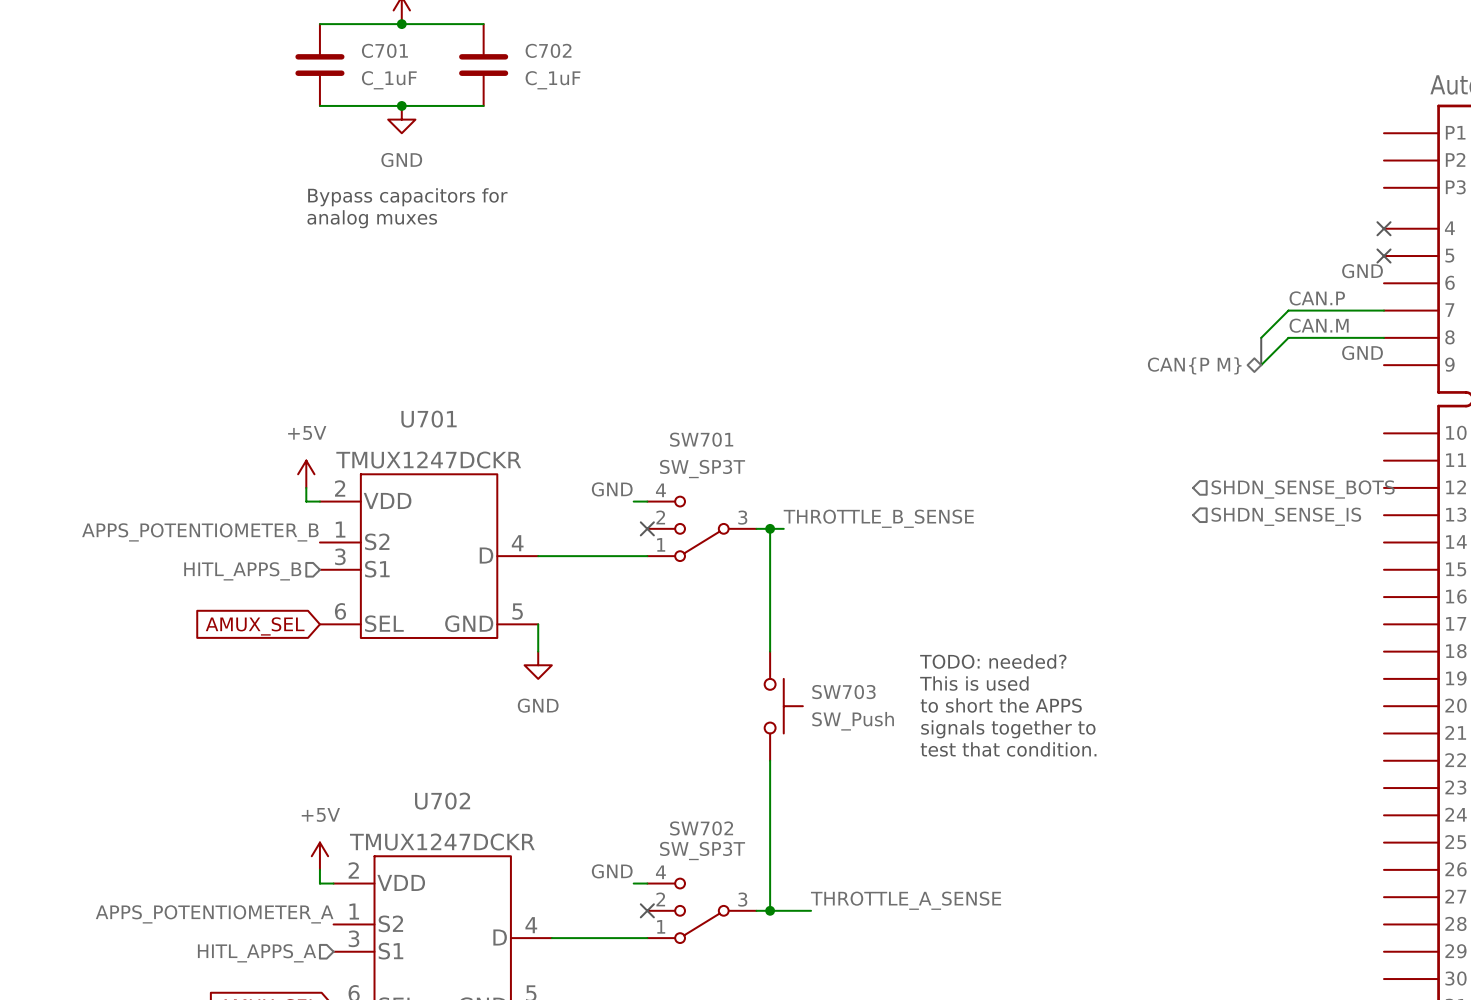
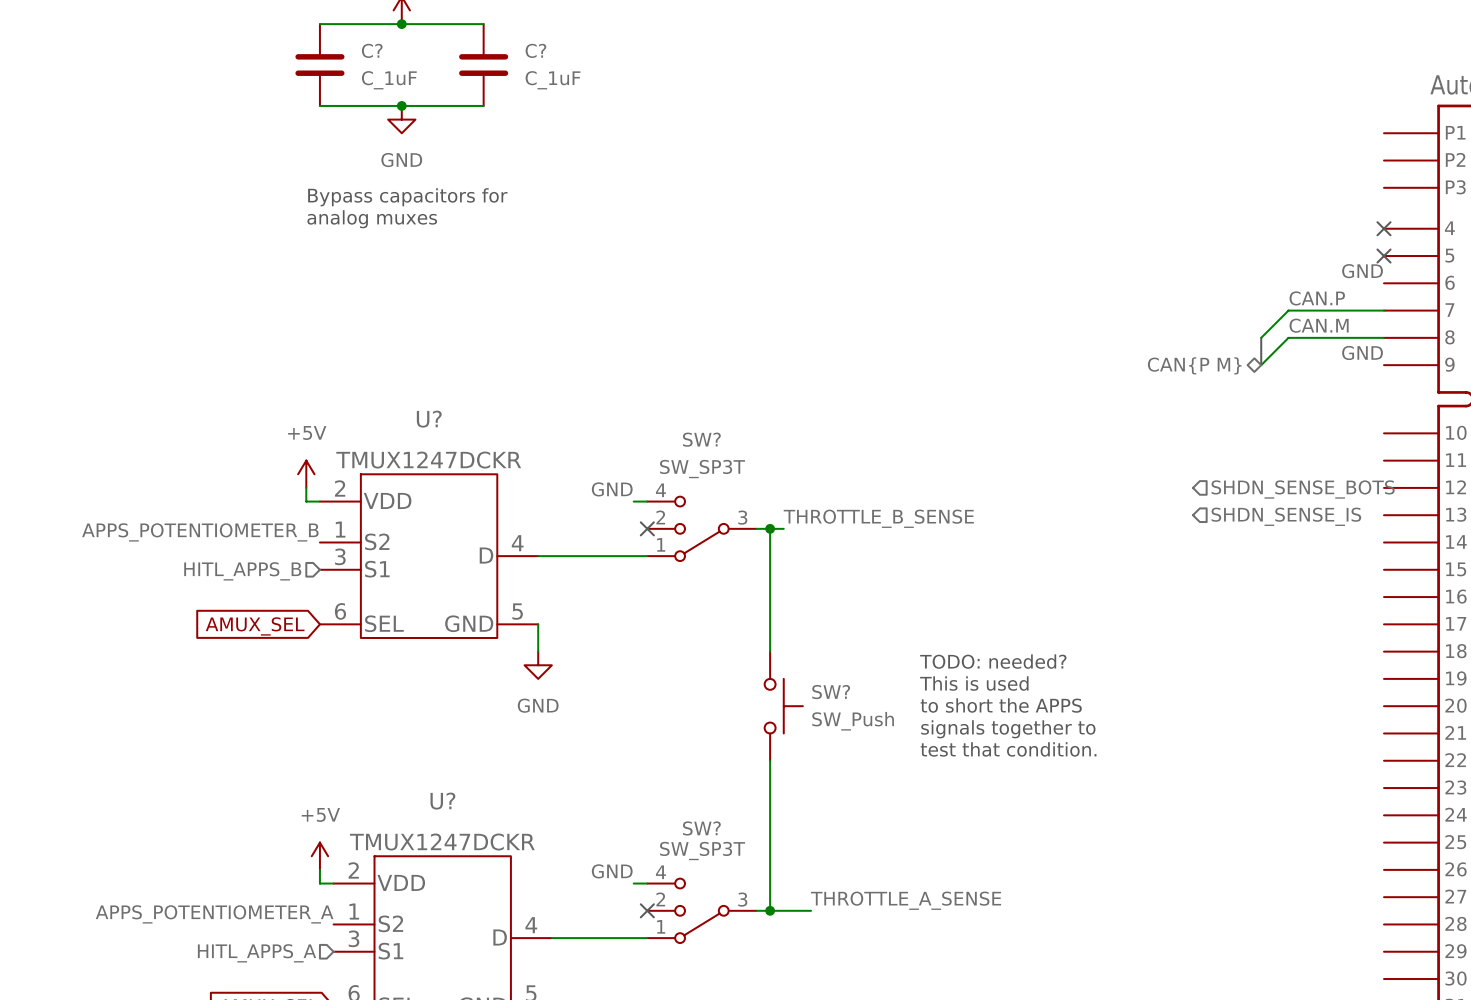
C701 name: C701 (384, 50) -> C? (372, 50)
C702 name: C702 (548, 50) -> C? (535, 50)
U701 name: U701 (429, 419) -> U? (429, 419)
SW701 name: SW701 (701, 439) -> SW? (701, 439)
SW703 name: SW703 (843, 692) -> SW? (831, 692)
U702 name: U702 (442, 801) -> U? (442, 801)
SW702 name: SW702 (701, 828) -> SW? (701, 828)

